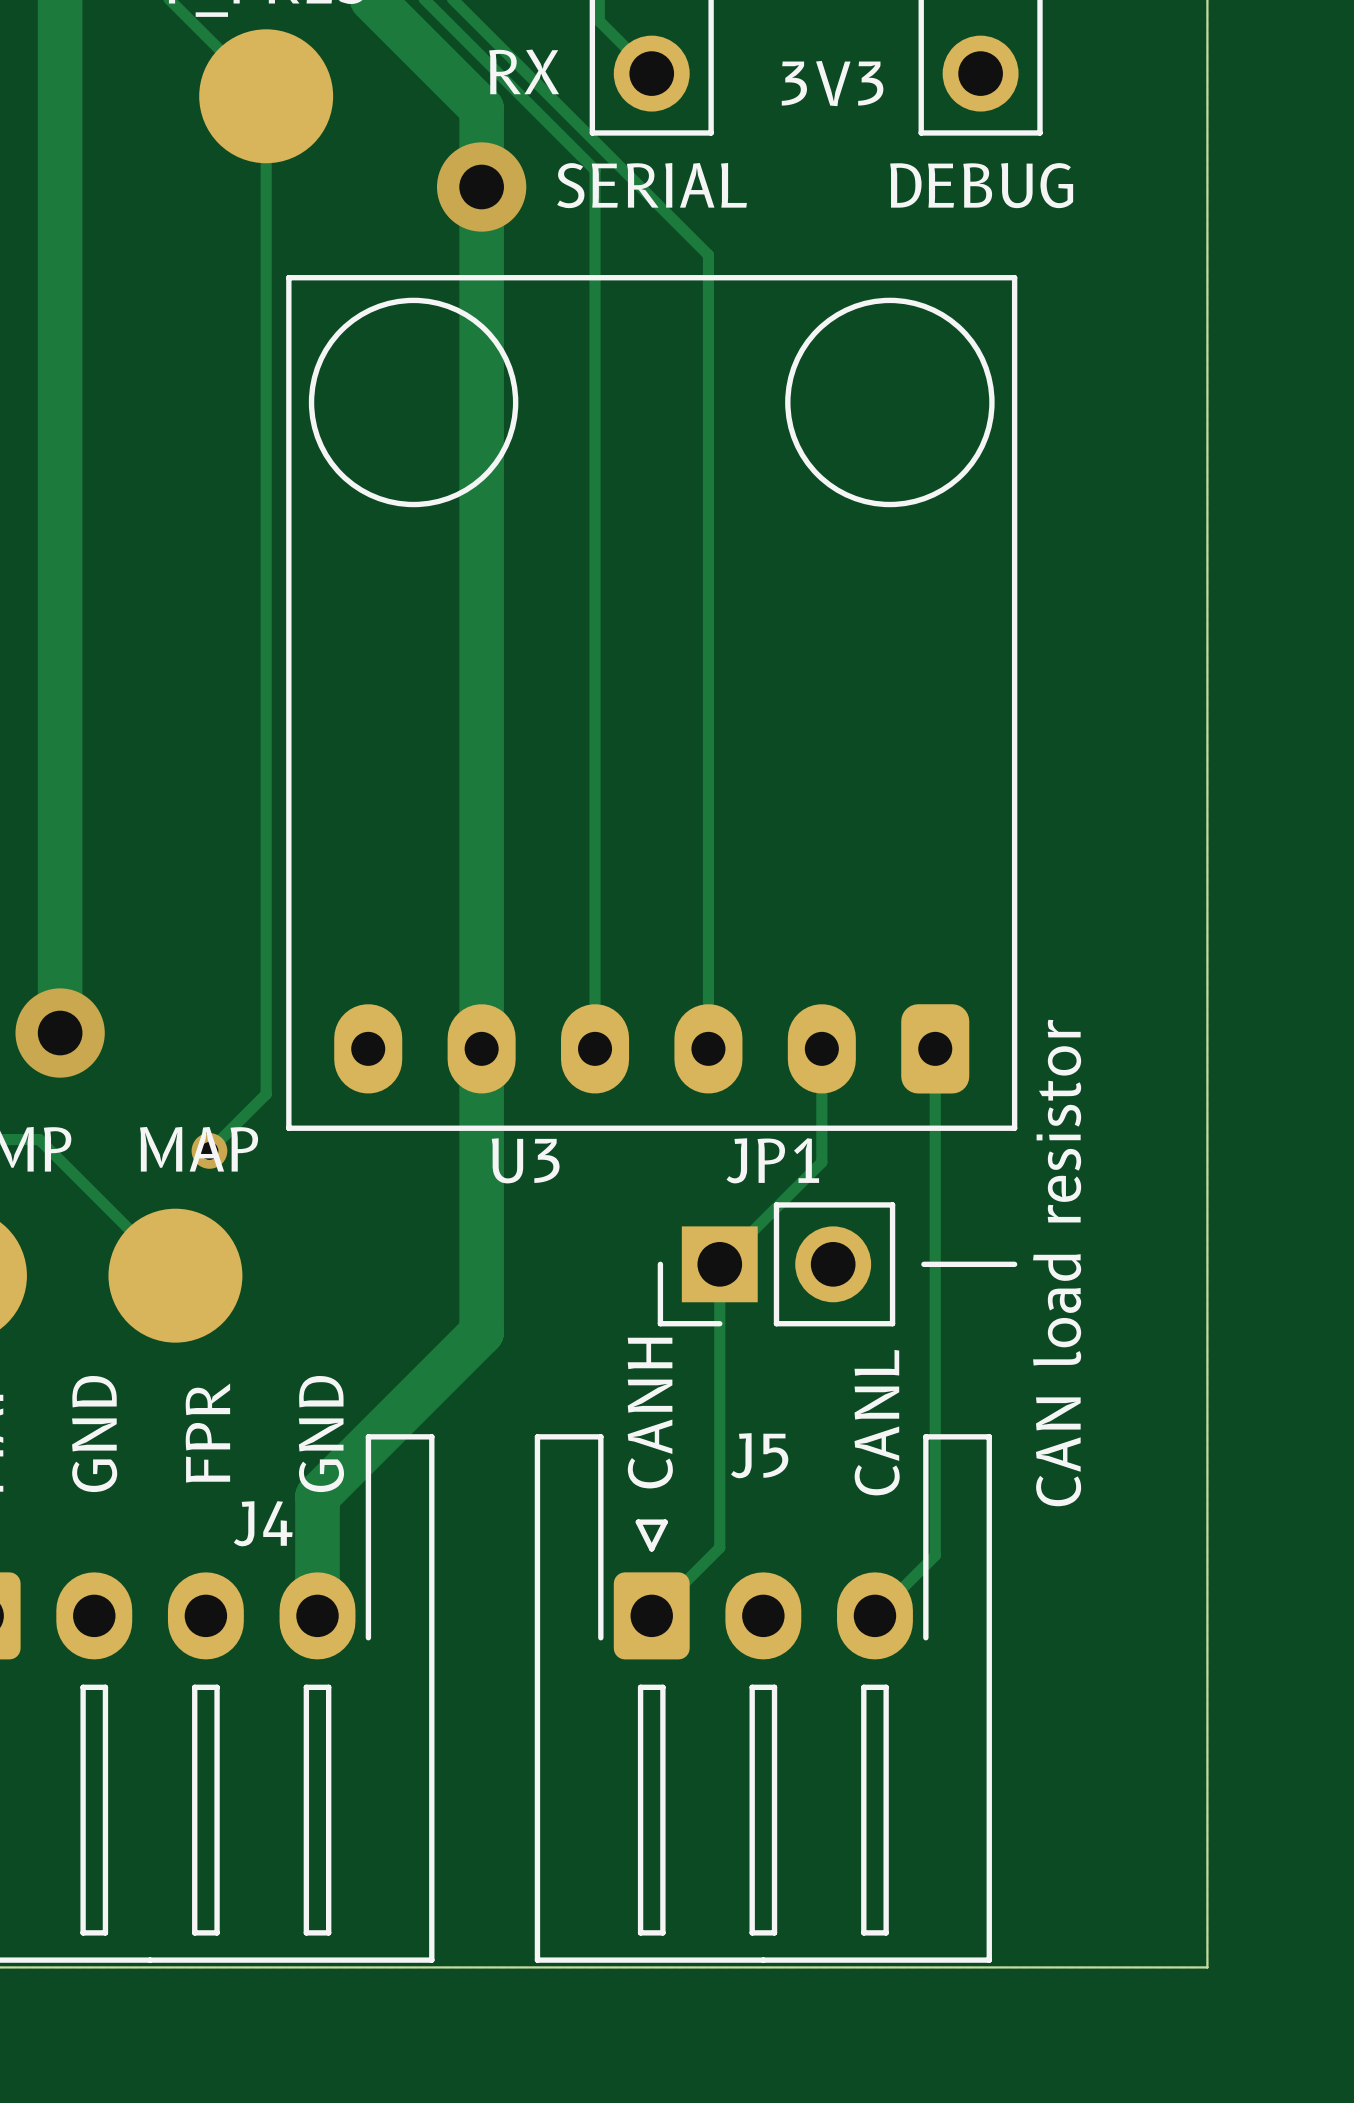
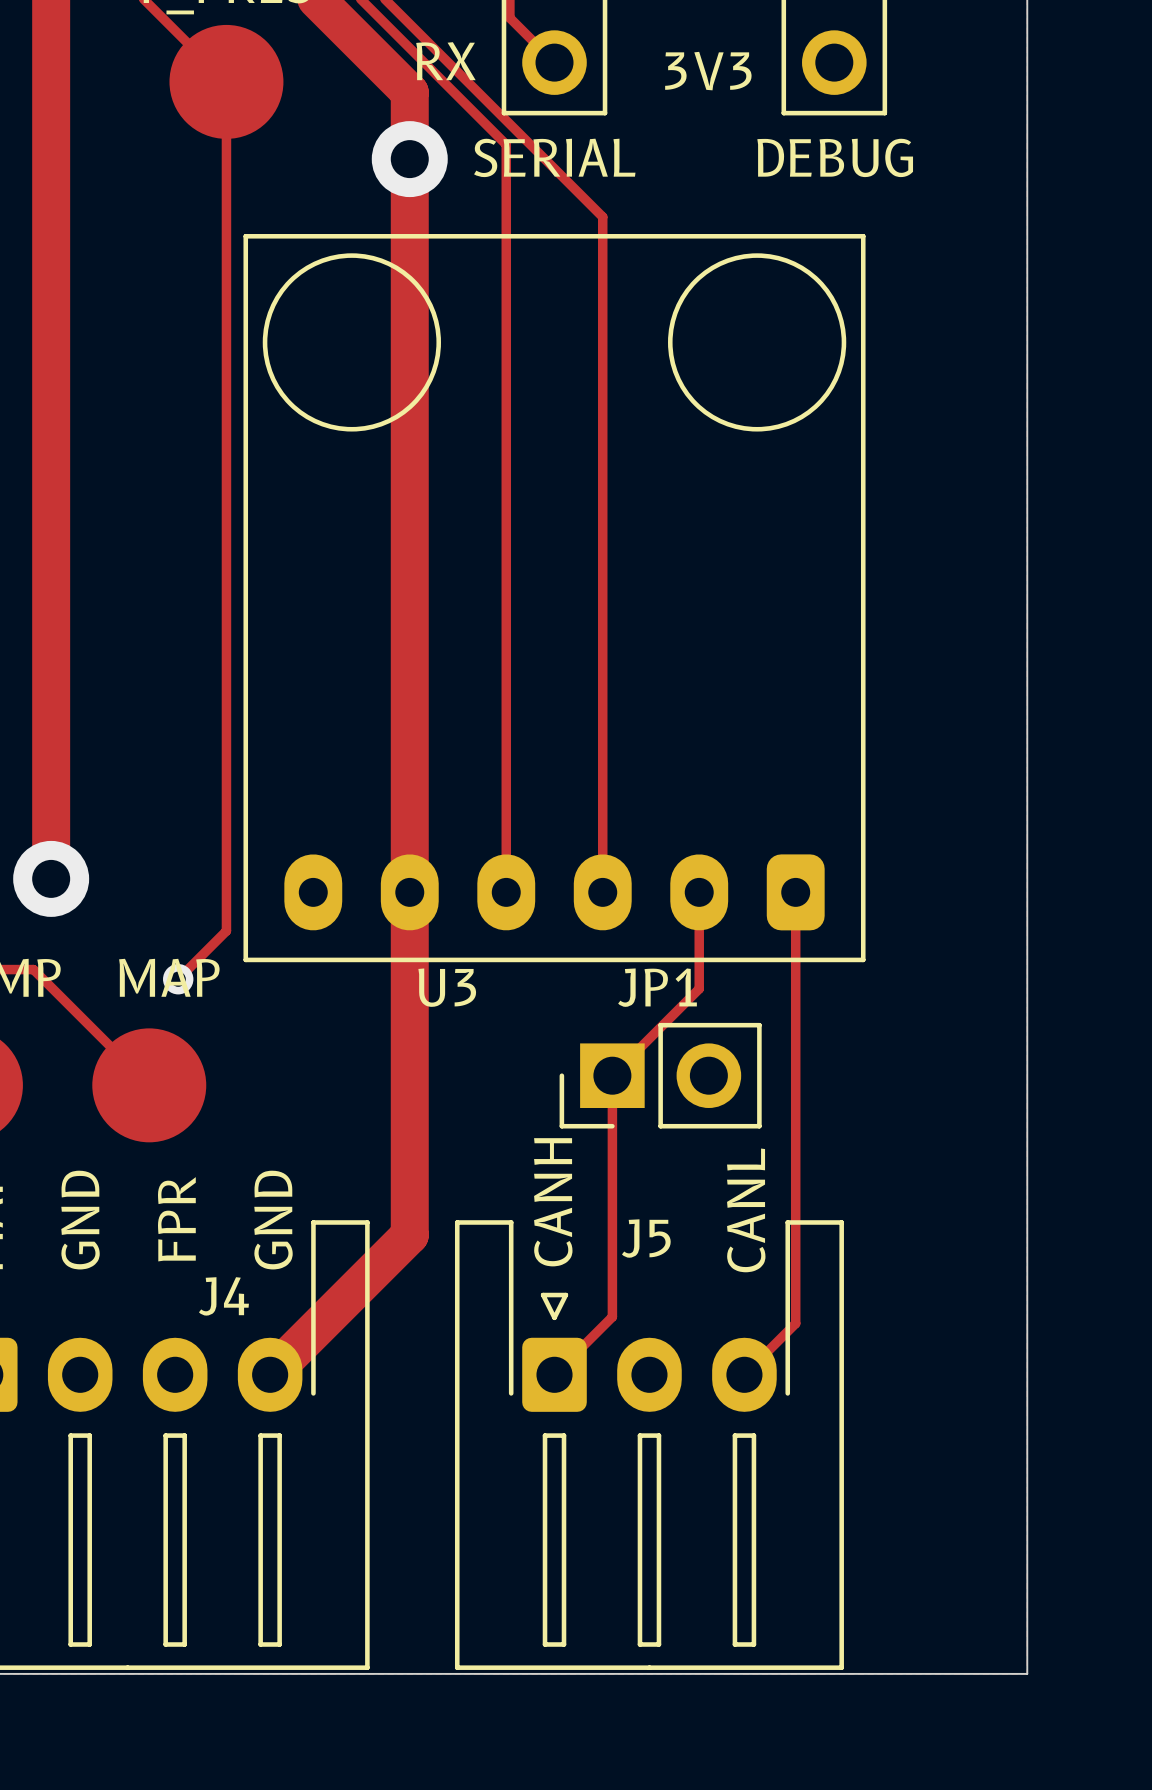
JP1 value: CAN load resistor (1057, 1263) -> none
line: (923, 1264) (1014, 1264) -> none
track: (481, 1332) (317, 1496) (317, 1615) -> (409, 1133) (409, 1235) (274, 1370)

